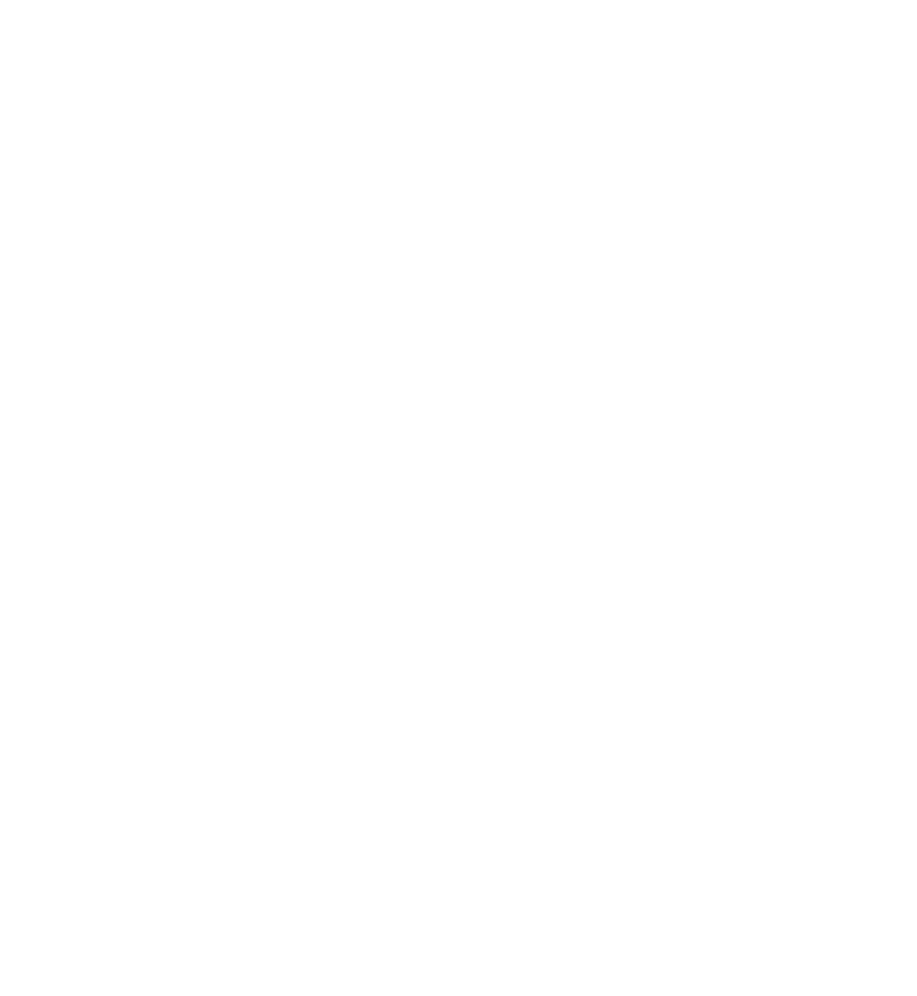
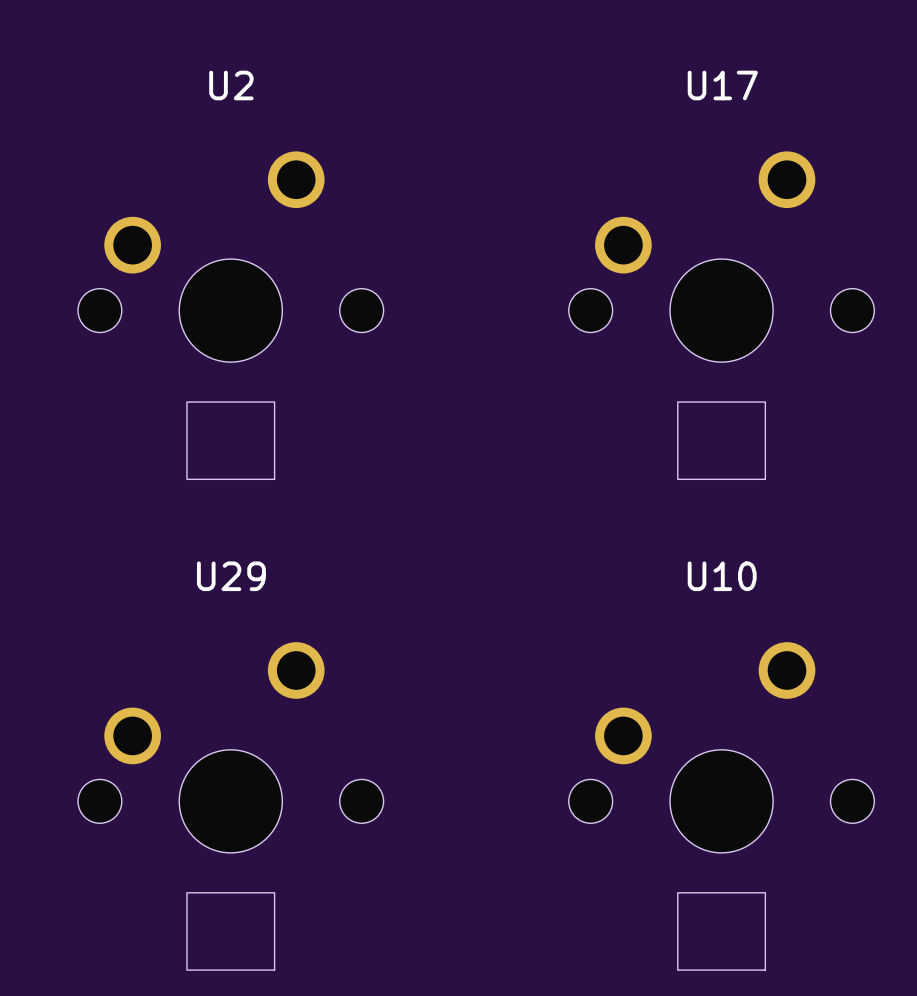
U2: none -> (230, 315)
U17: none -> (721, 315)
U29: none -> (230, 806)
U10: none -> (721, 806)

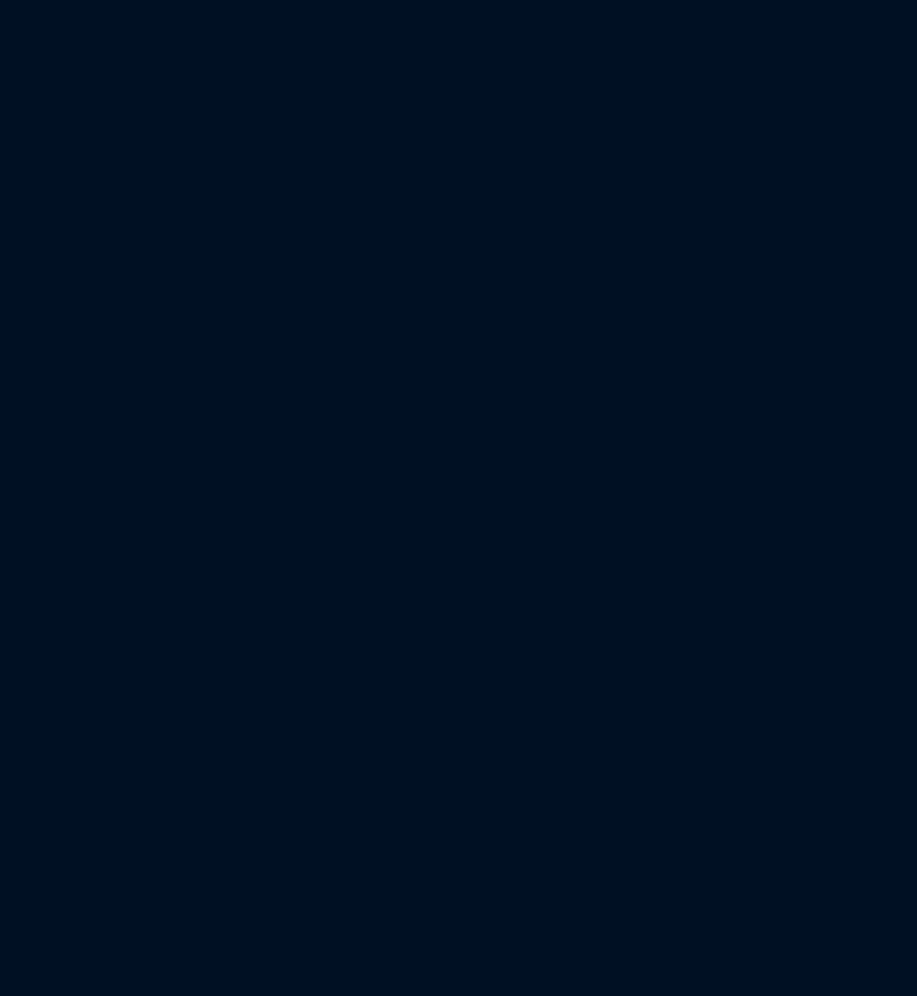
U2: (230, 315) -> none
U17: (721, 315) -> none
U29: (230, 806) -> none
U10: (721, 806) -> none

